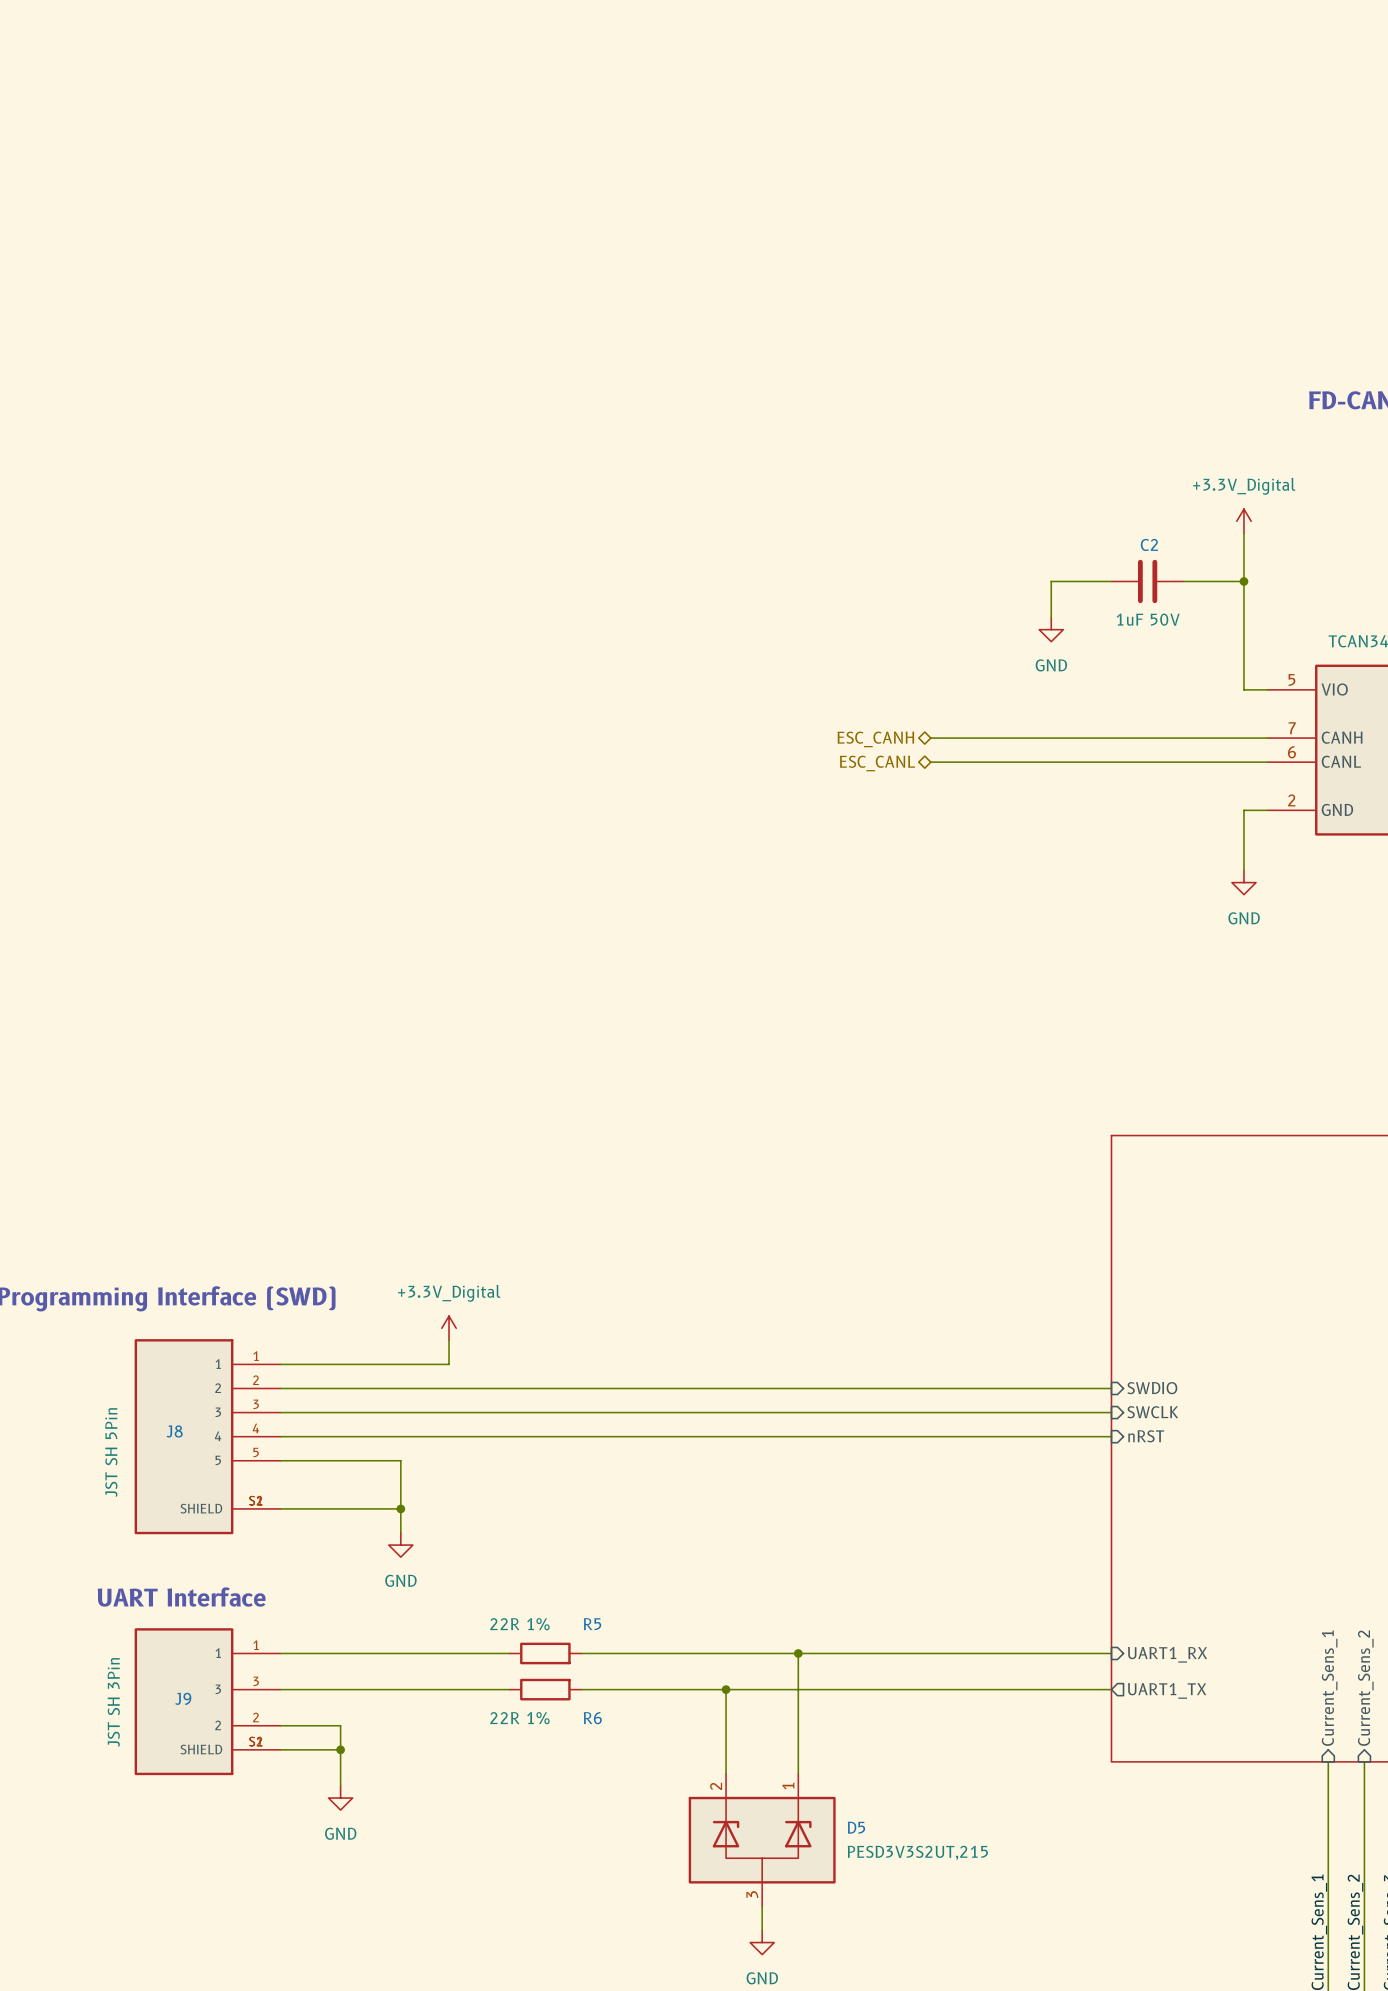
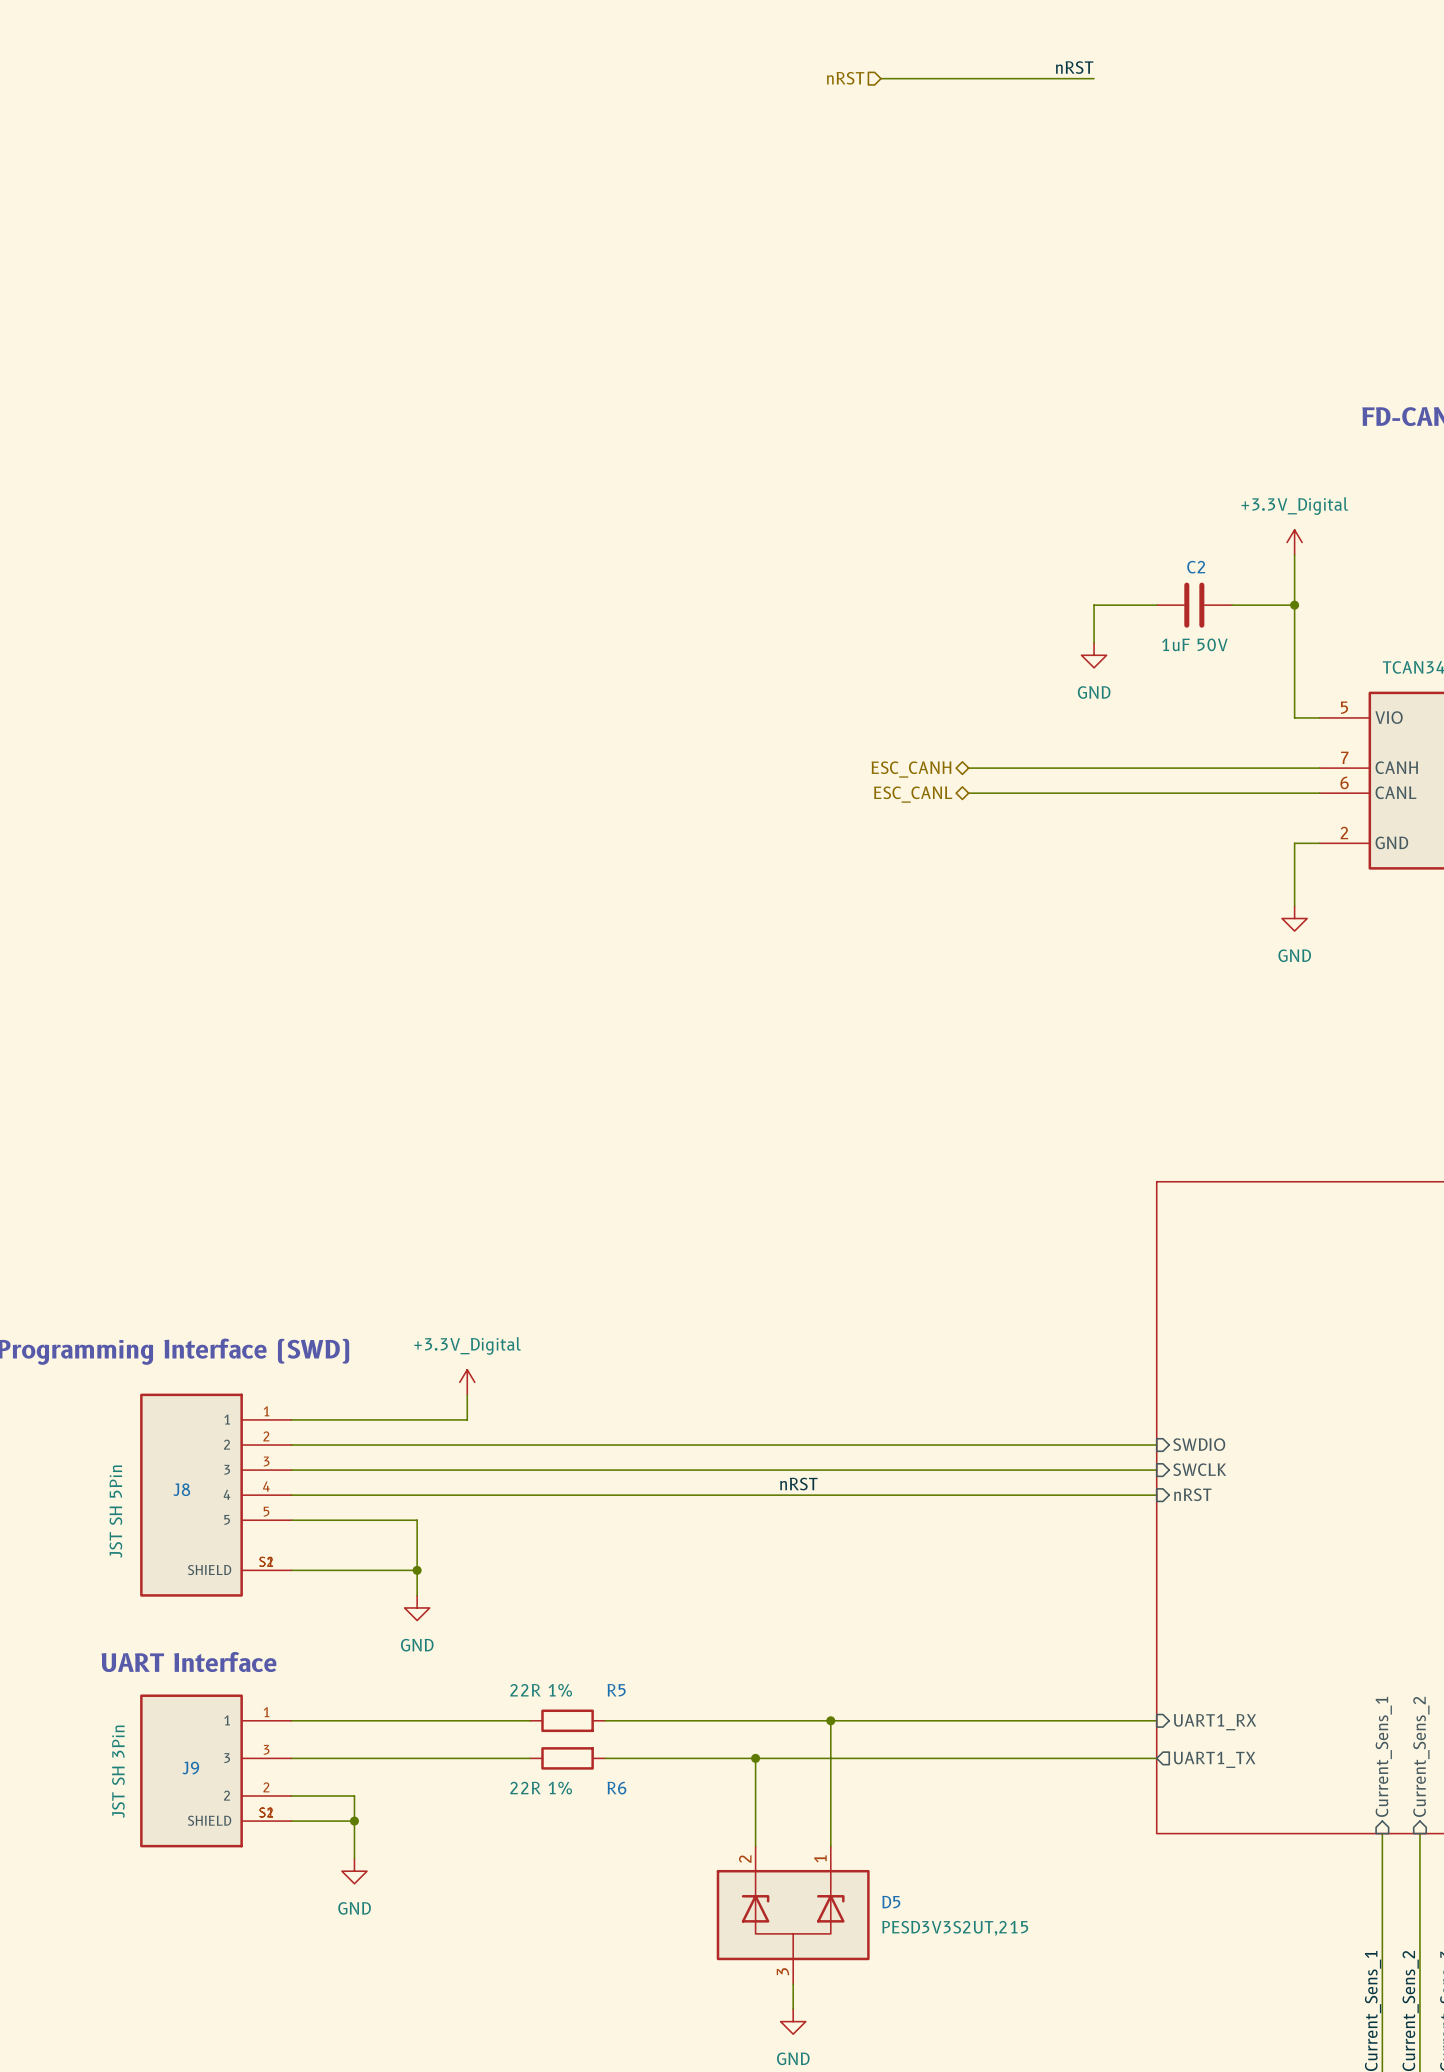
label: none -> nRST (1074, 67)
hierarchical label: none -> nRST (845, 78)
wire: none -> (880, 78) (1094, 78)
label: none -> nRST (798, 1484)

